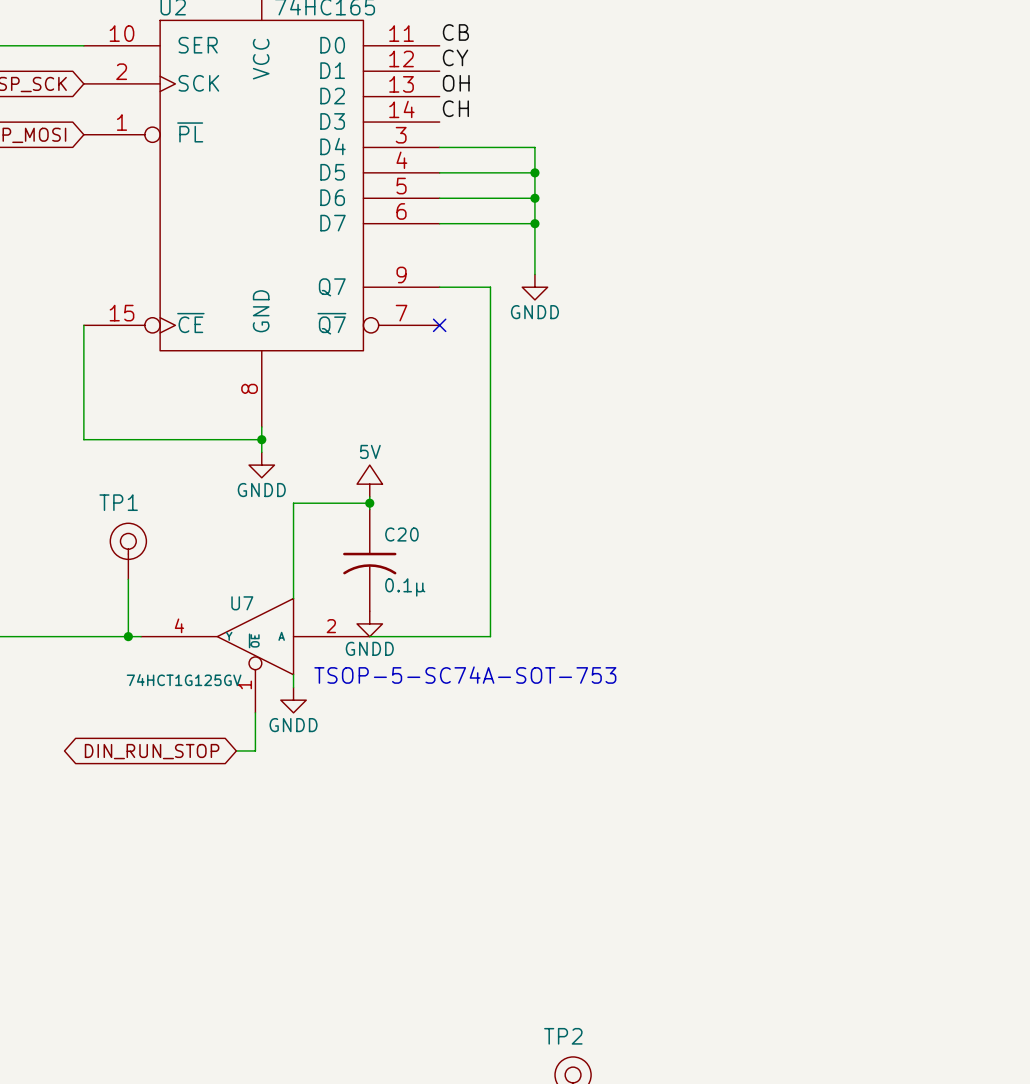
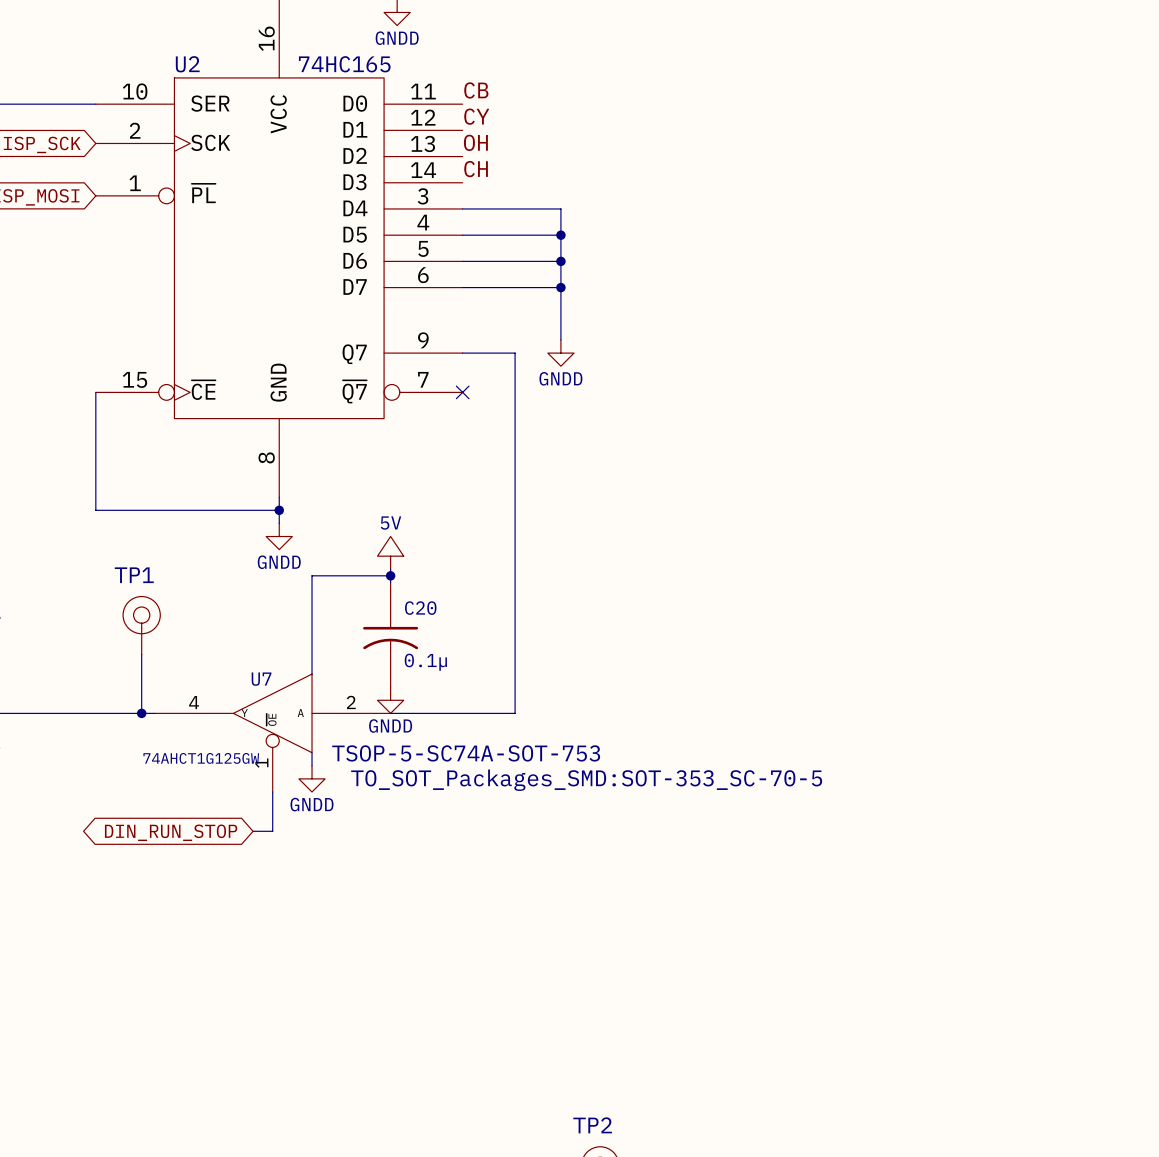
U7 value: 74HCT1G125GV (184, 680) -> 74AHCT1G125GW (201, 758)
U7 text: none -> TO_SOT_Packages_SMD:SOT-353_SC-70-5 (586, 780)

